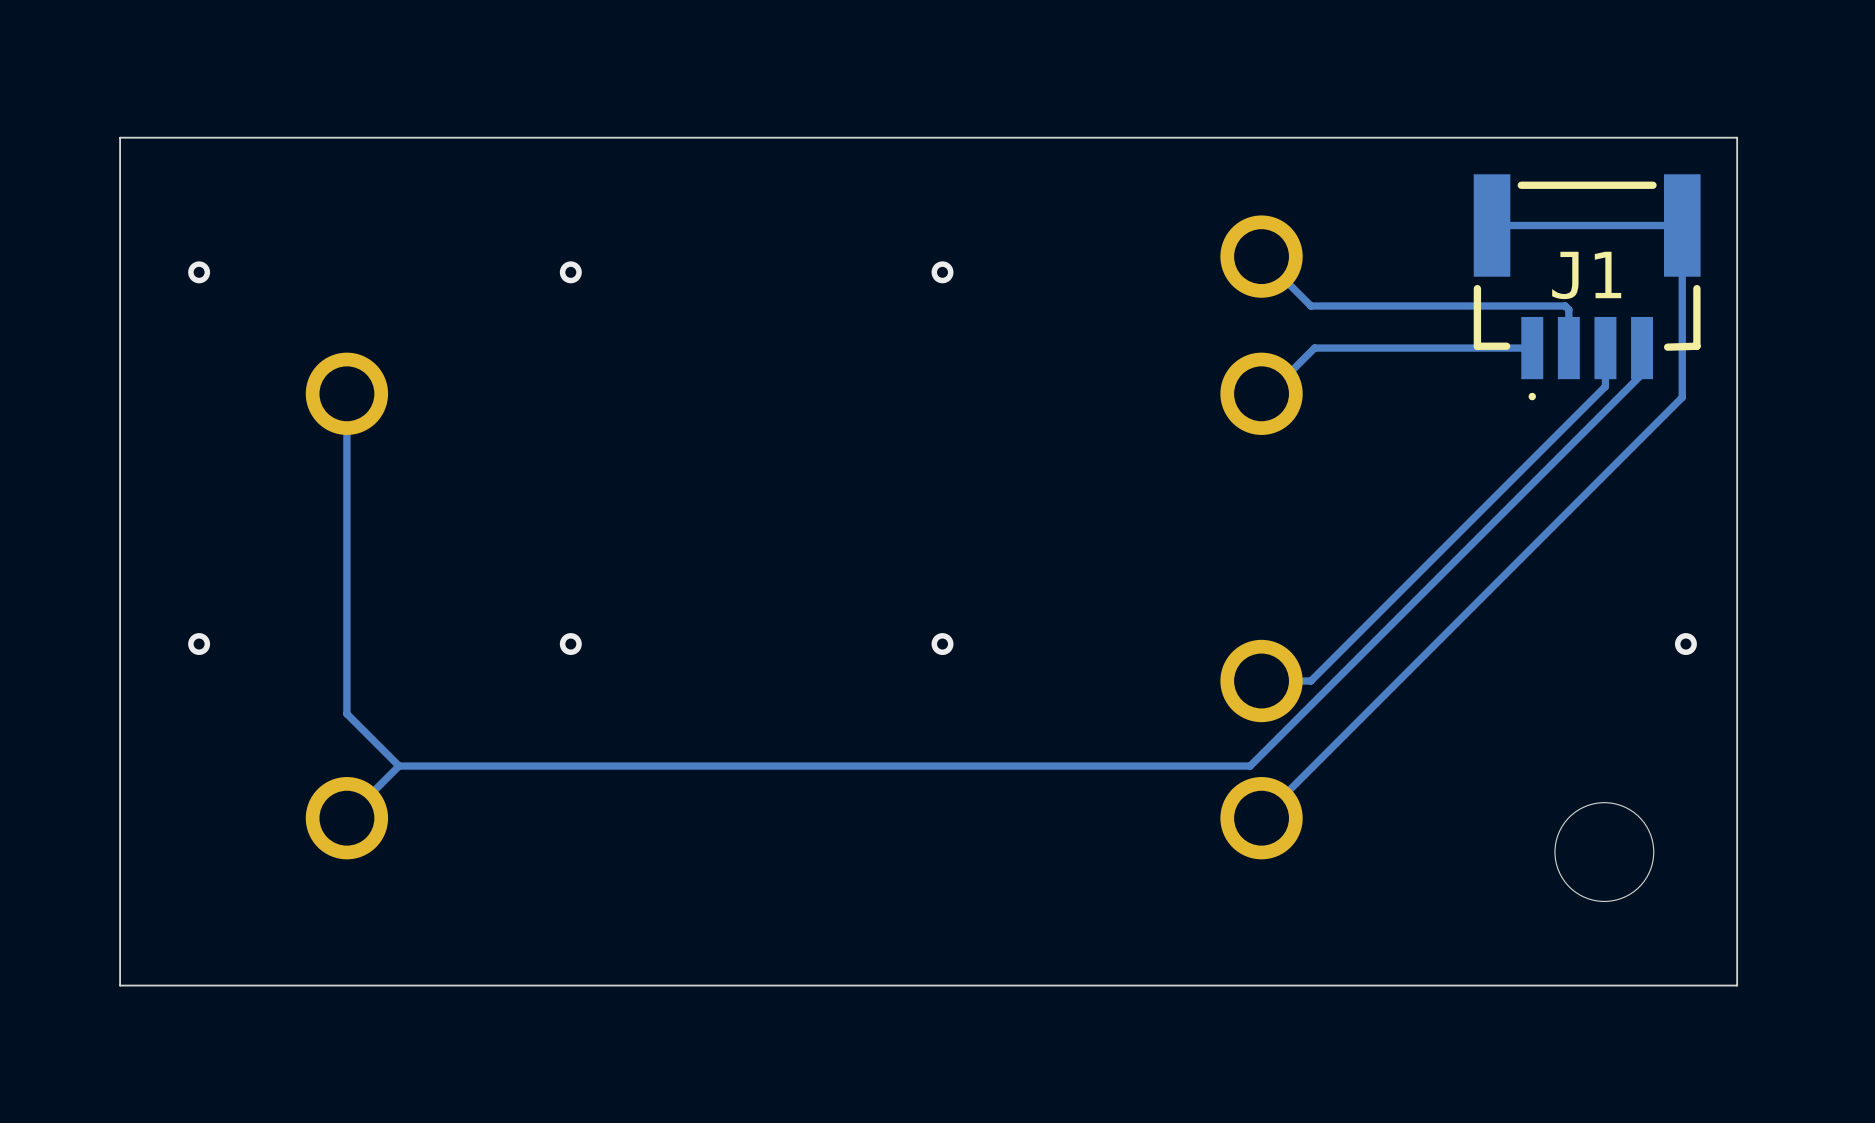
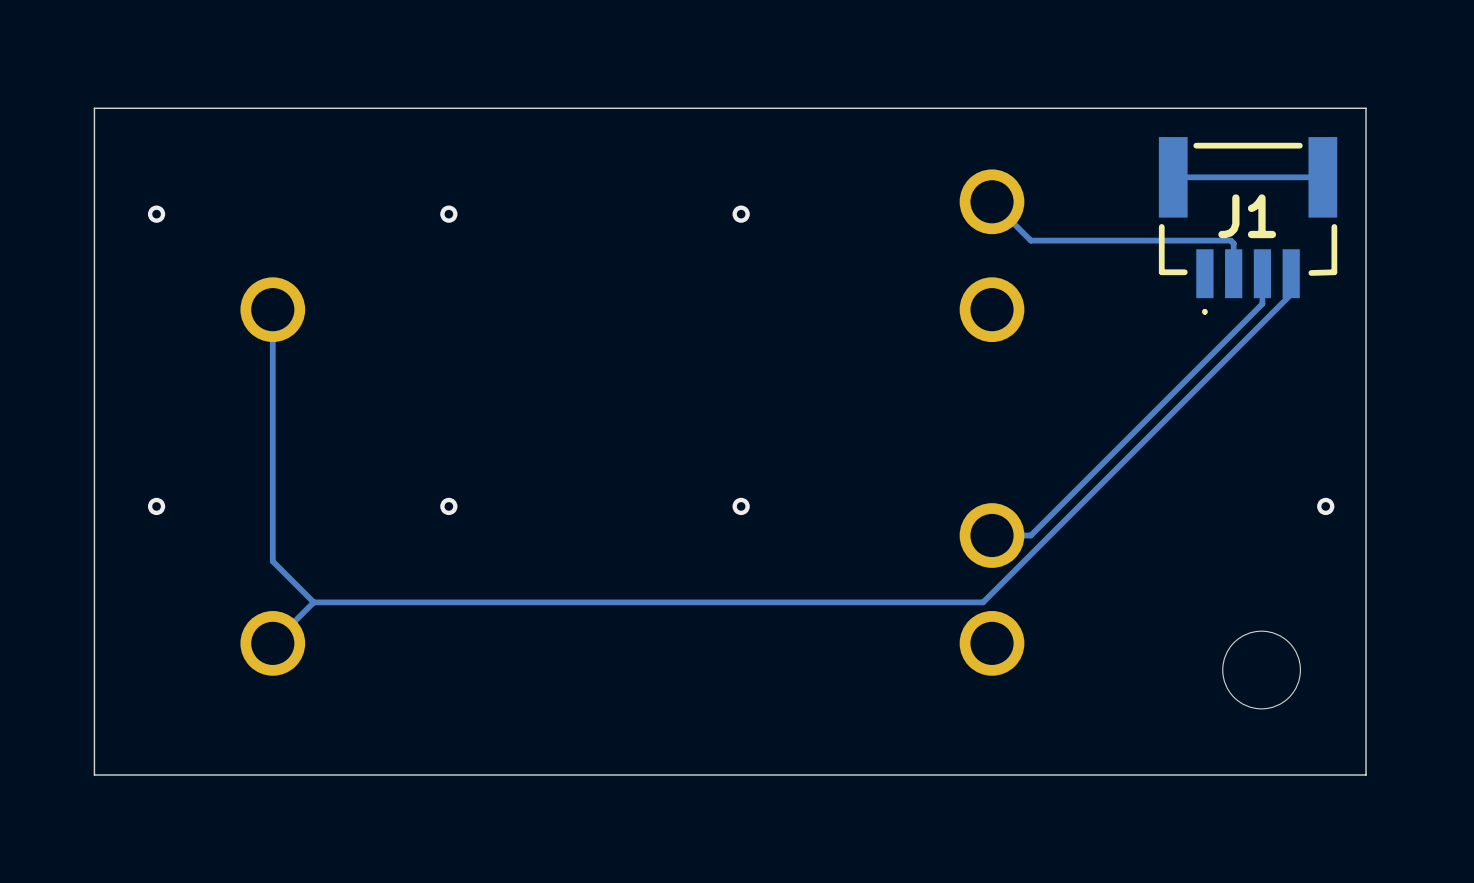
track: (1682, 225) (1682, 397) (1261, 818) -> none
track: (1532, 348) (1314, 348) (1268, 393) -> none

